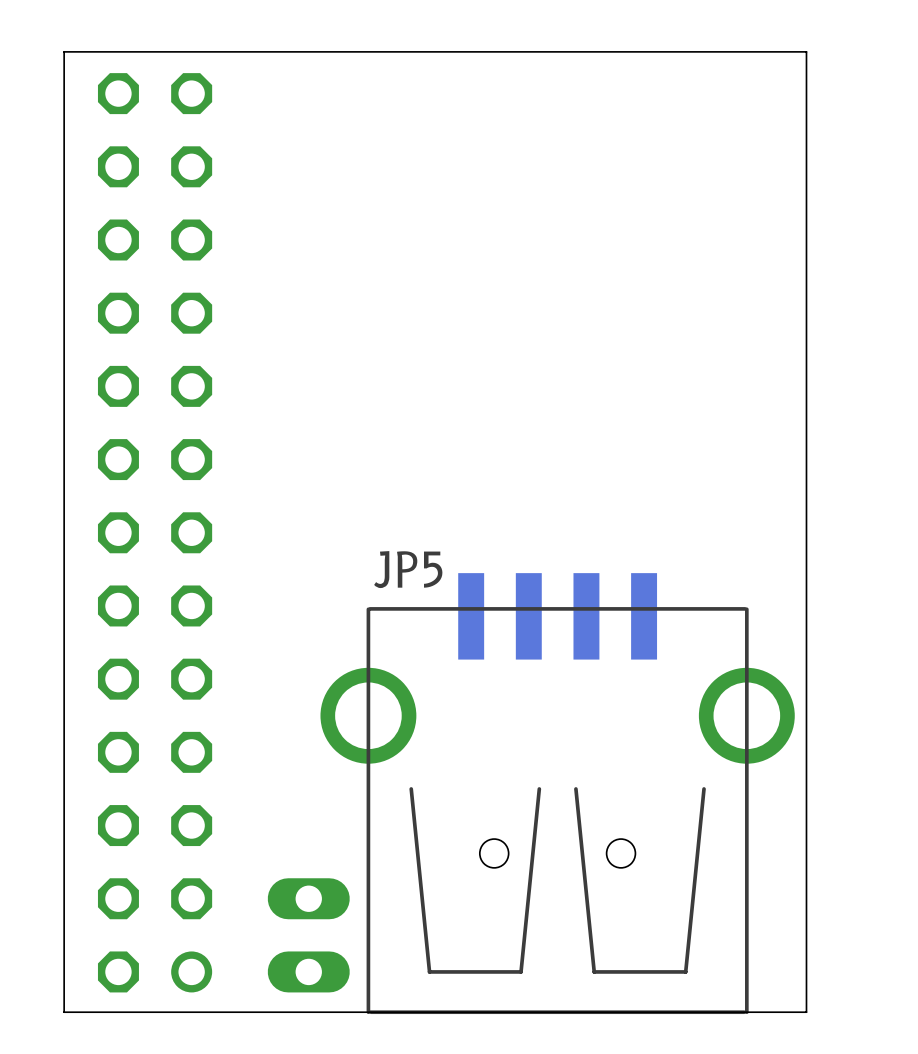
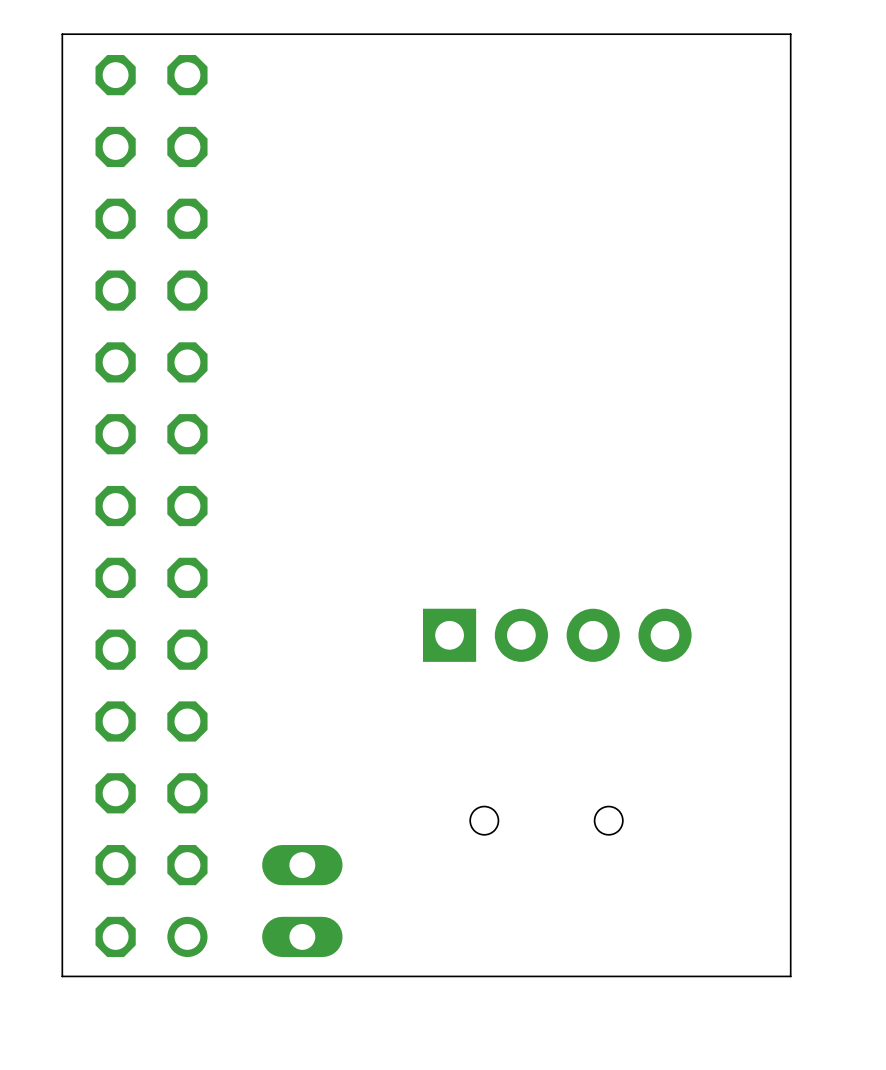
part: none -> (557, 635)
JP5: (557, 793) -> none

